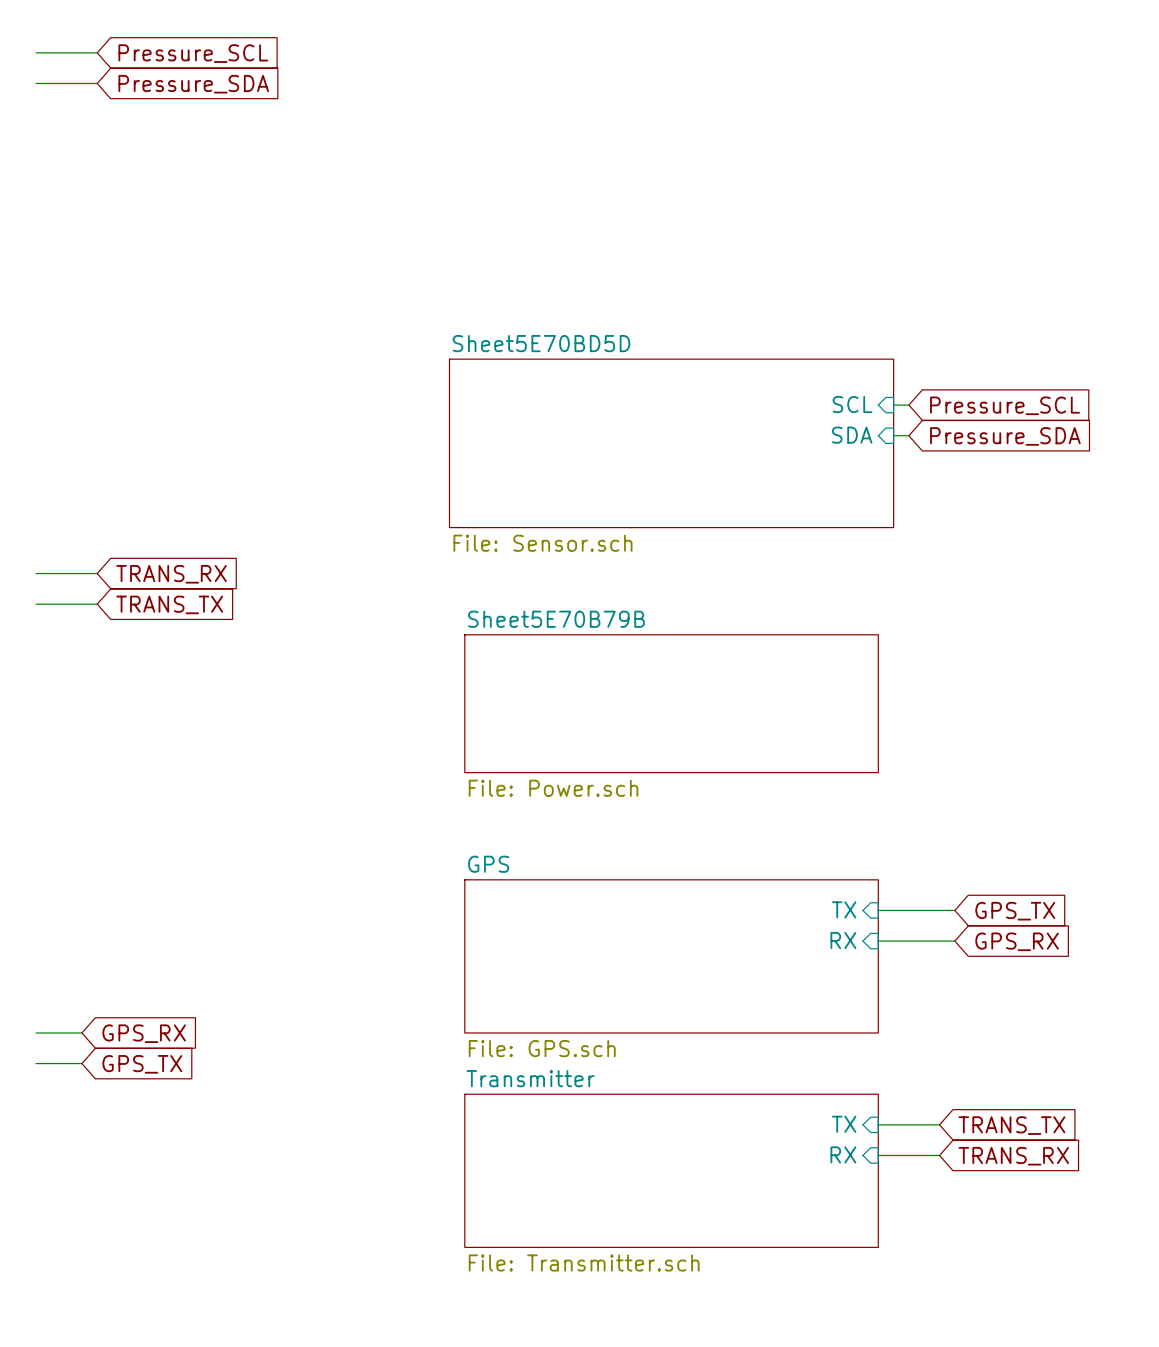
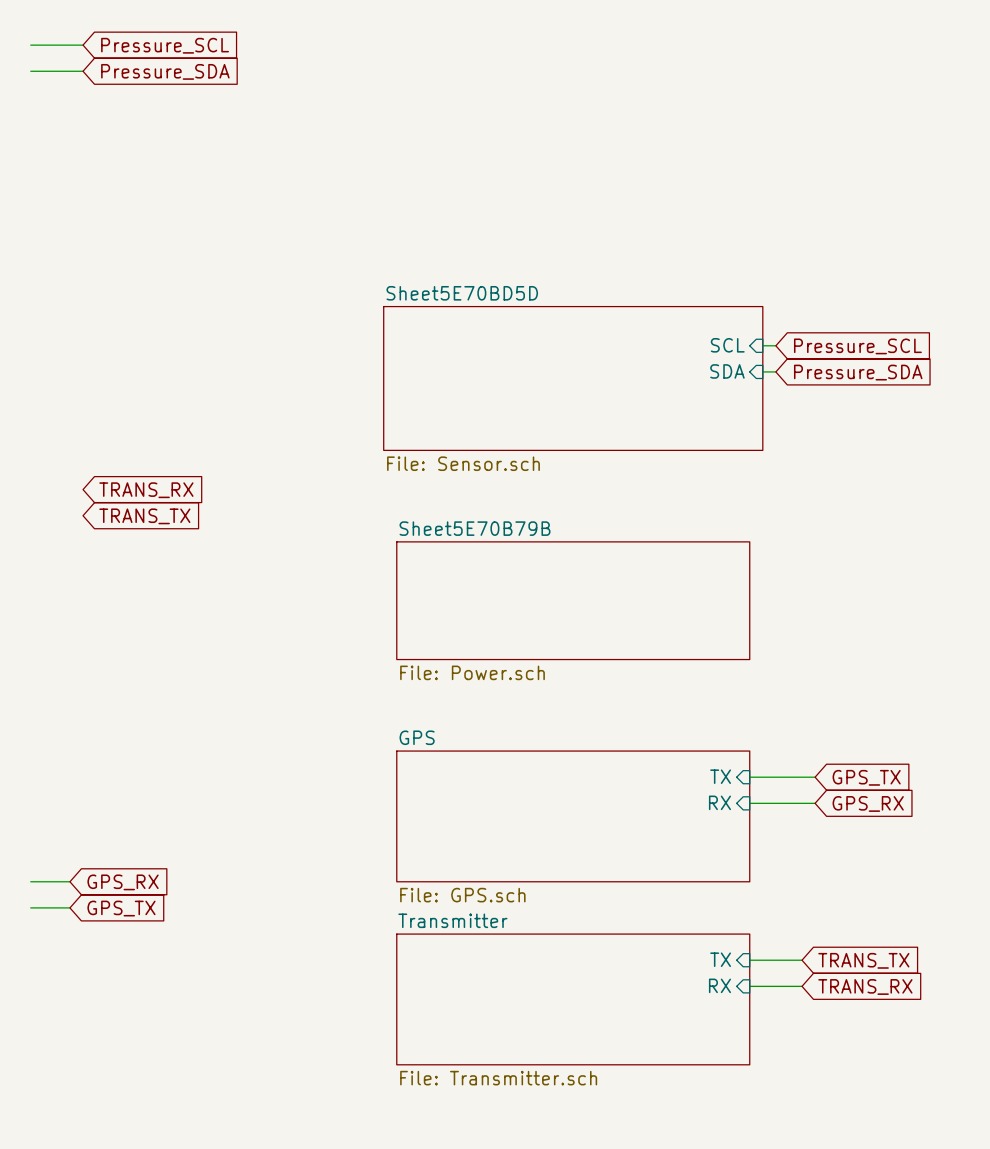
wire: (36, 573) (97, 573) -> none
wire: (36, 604) (97, 604) -> none

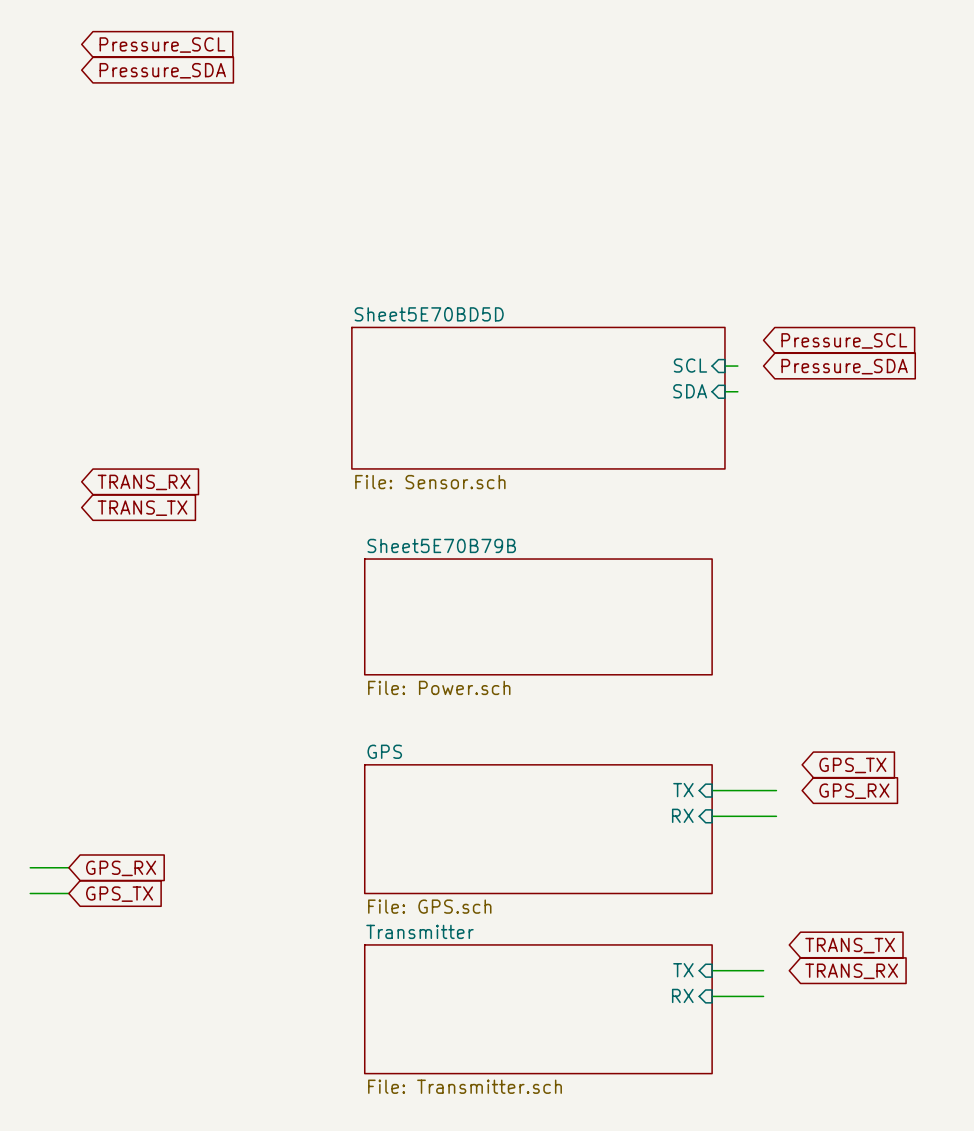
wire: (30, 45) (83, 45) -> none
wire: (30, 71) (83, 71) -> none
sheet pin position: SCL (727, 345) -> SCL (690, 365)
wire: (762, 345) (775, 345) -> (724, 391) (737, 391)
sheet pin position: SDA (727, 371) -> SDA (690, 391)
wire: (762, 371) (775, 371) -> (724, 366) (737, 366)
sheet Sheet5E70BD5D position: (573, 378) -> (538, 398)
sheet Sheet5E70B79B position: (573, 600) -> (538, 616)
sheet pin position: TX (720, 776) -> TX (683, 790)
wire: (749, 777) (815, 777) -> (712, 816) (776, 816)
sheet pin position: RX (719, 802) -> RX (682, 815)
wire: (788, 803) (815, 803) -> (712, 790) (737, 790)
sheet GPS position: (573, 816) -> (538, 829)
sheet pin position: TX (720, 959) -> TX (683, 970)
wire: (749, 960) (802, 960) -> (712, 996) (763, 996)
sheet pin position: RX (719, 985) -> RX (682, 995)
wire: (775, 986) (802, 986) -> (712, 970) (737, 970)
sheet Transmitter position: (573, 999) -> (538, 1009)

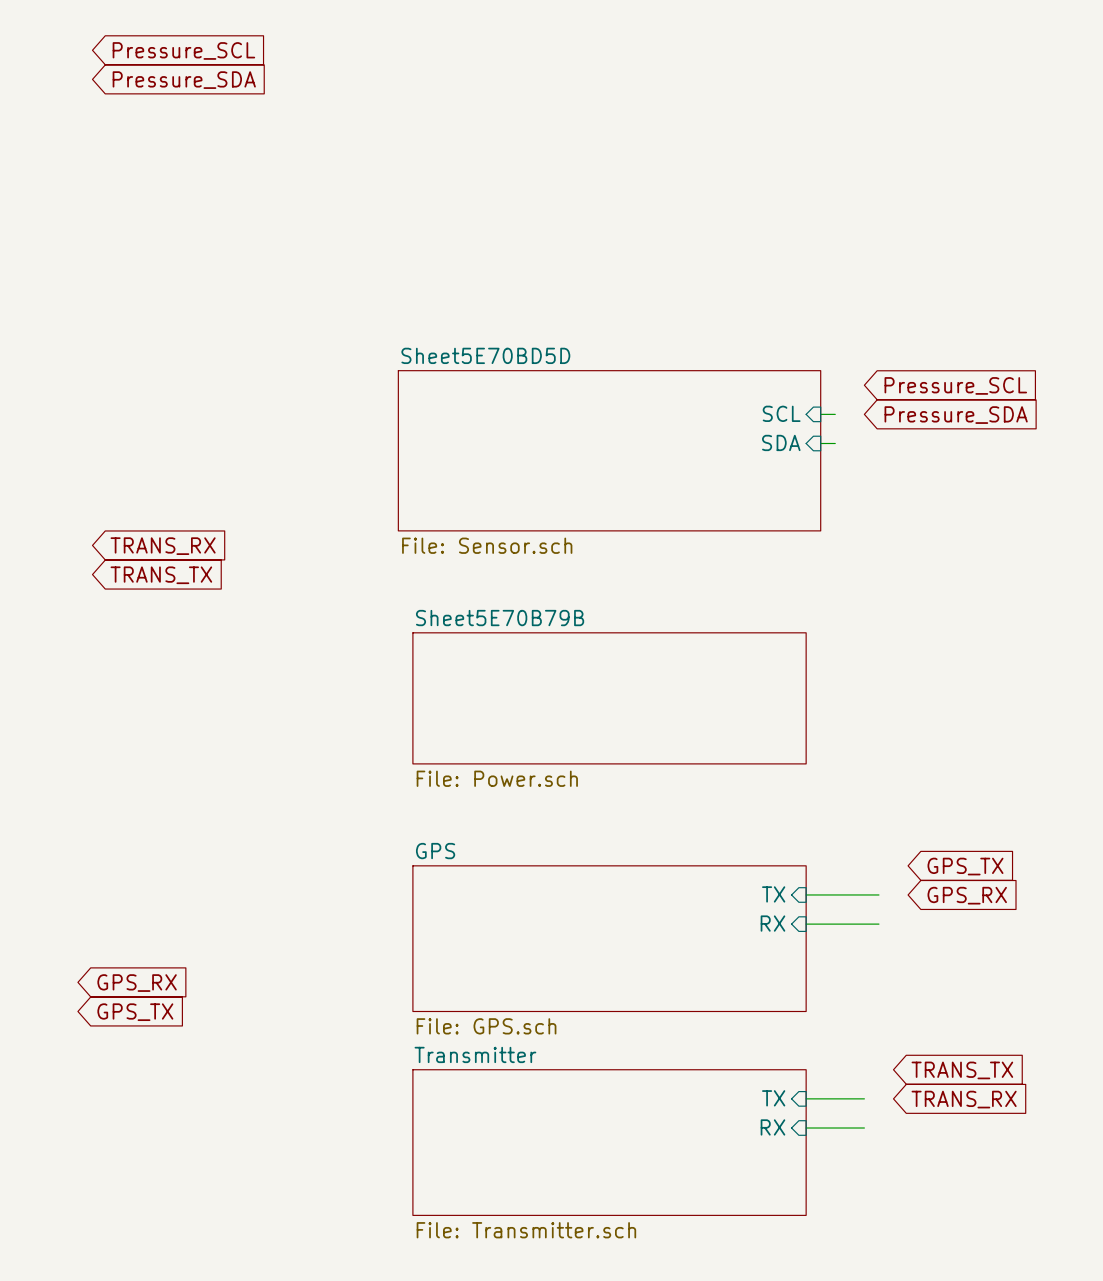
wire: (30, 867) (68, 867) -> none
wire: (30, 893) (68, 893) -> none

